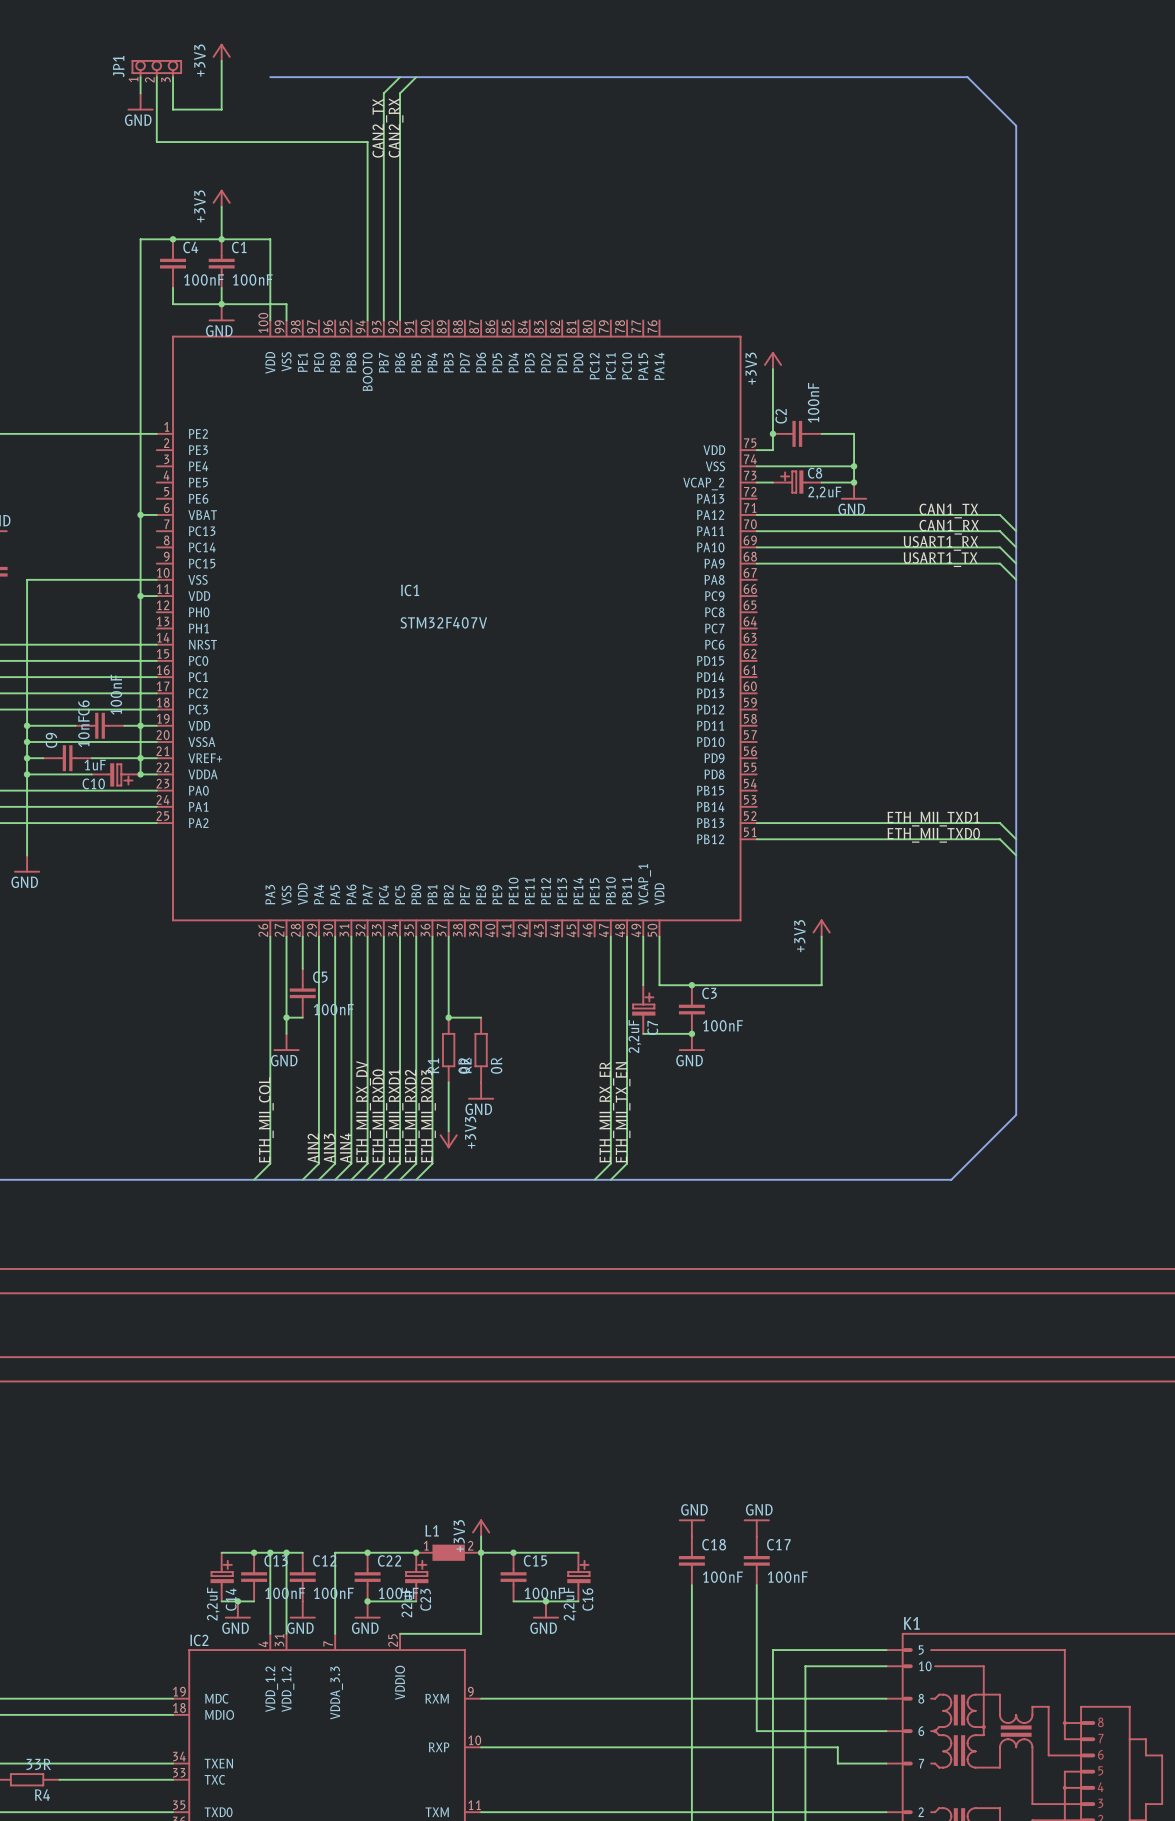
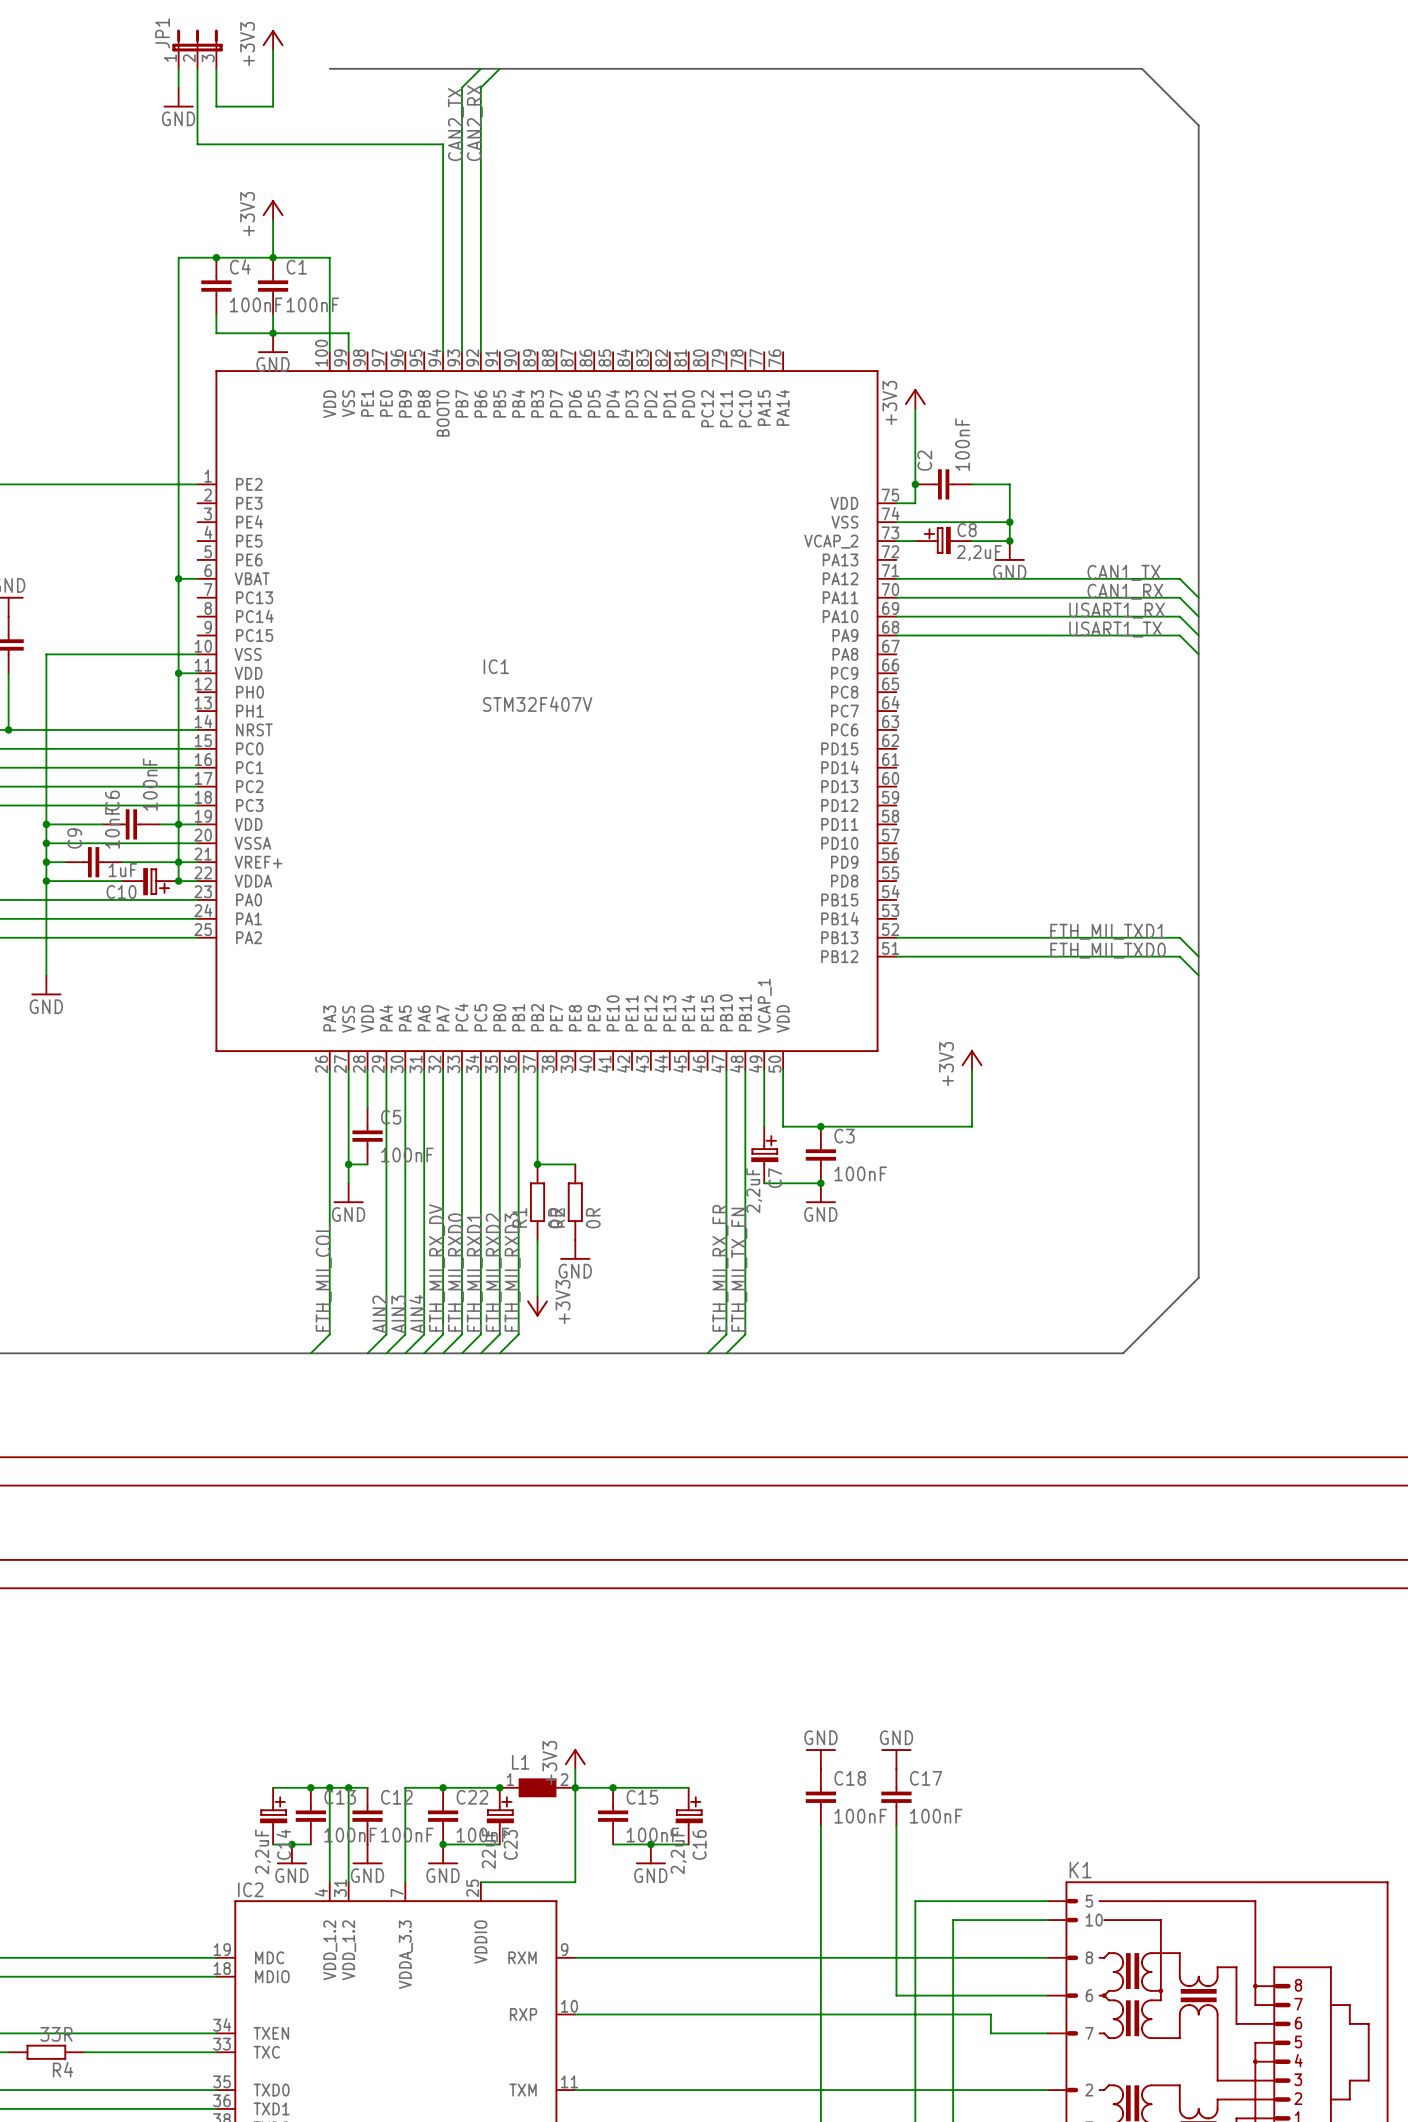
JP1 symbol: [131, 60, 182, 78] -> [172, 29, 223, 69]

